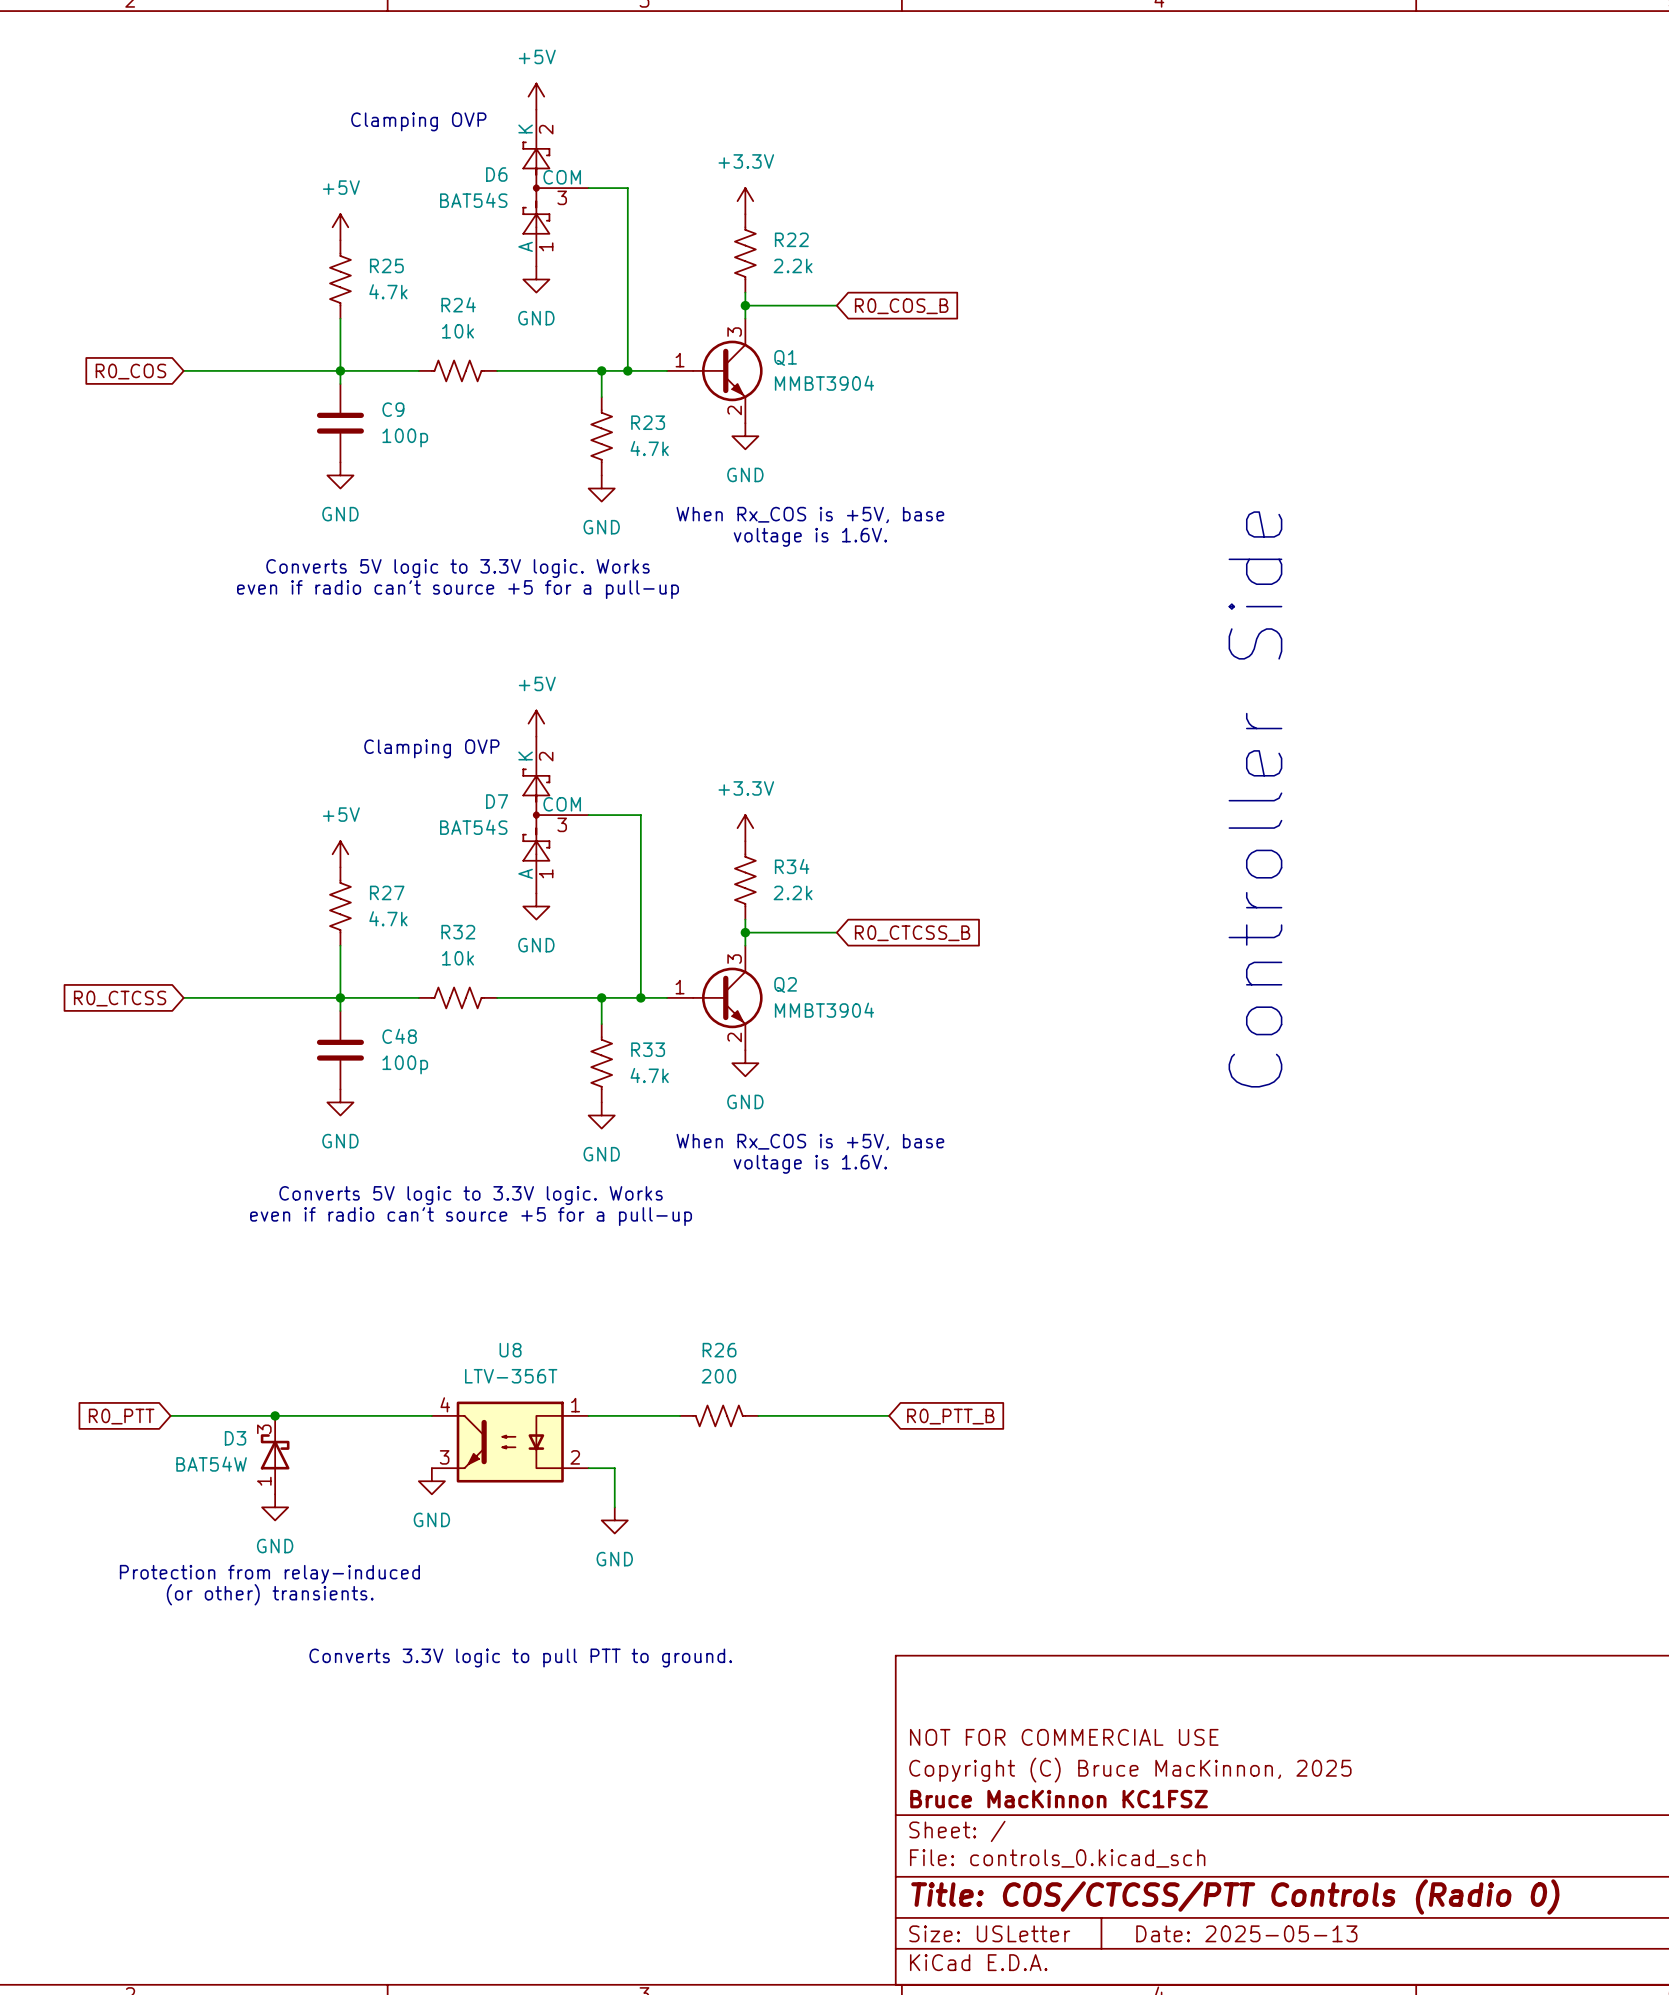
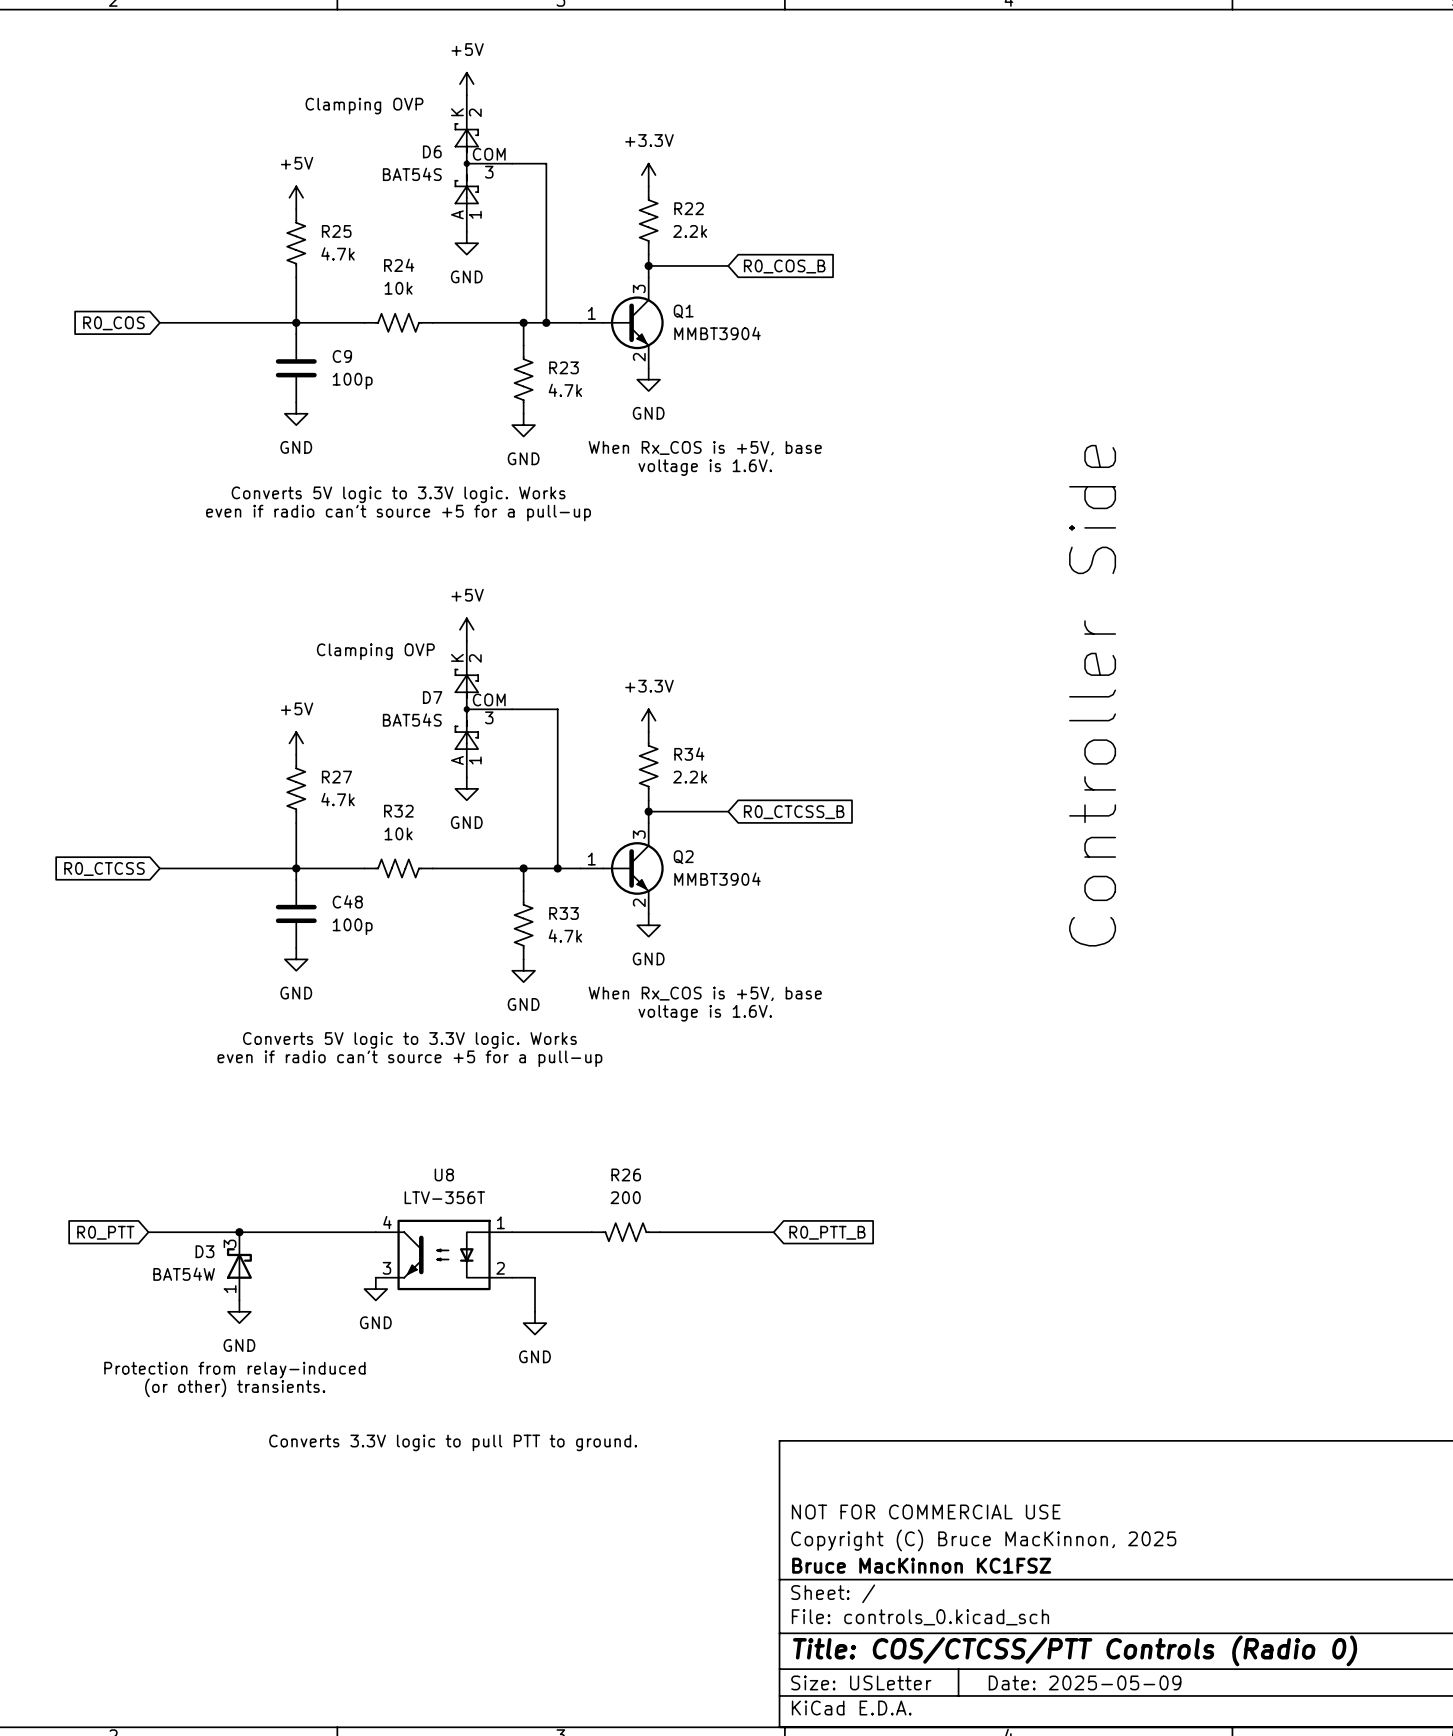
title block: Date: 2025-05-13 (1246, 1933) -> Date: 2025-05-09 (1085, 1682)

